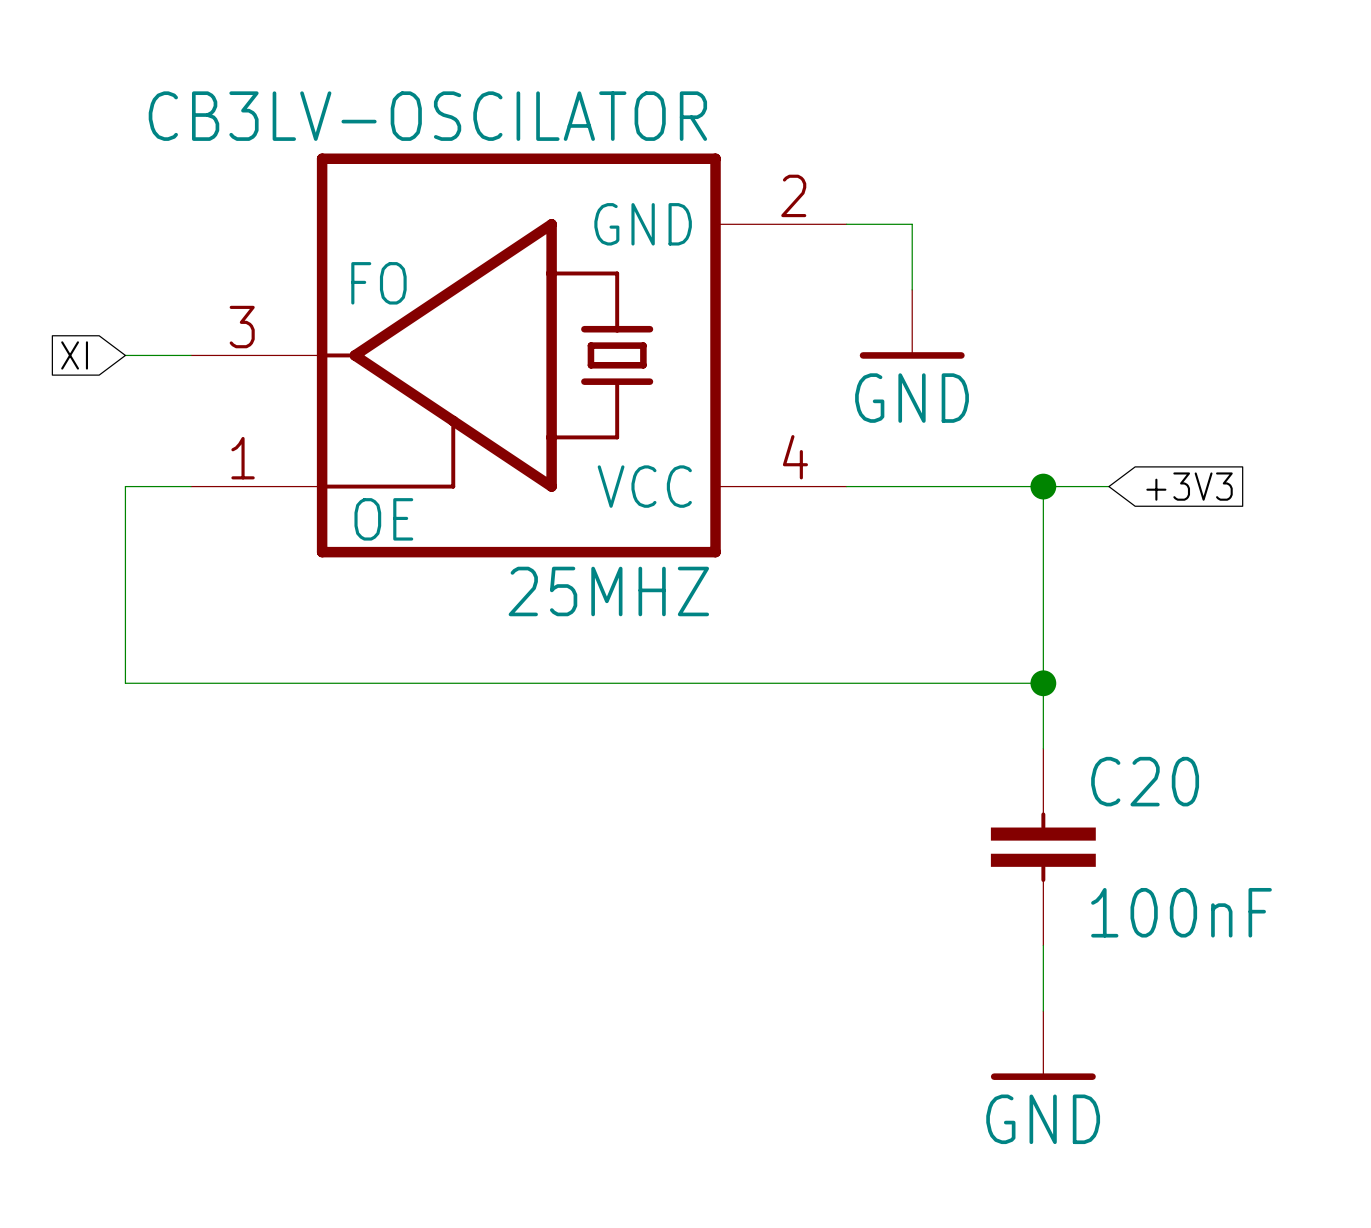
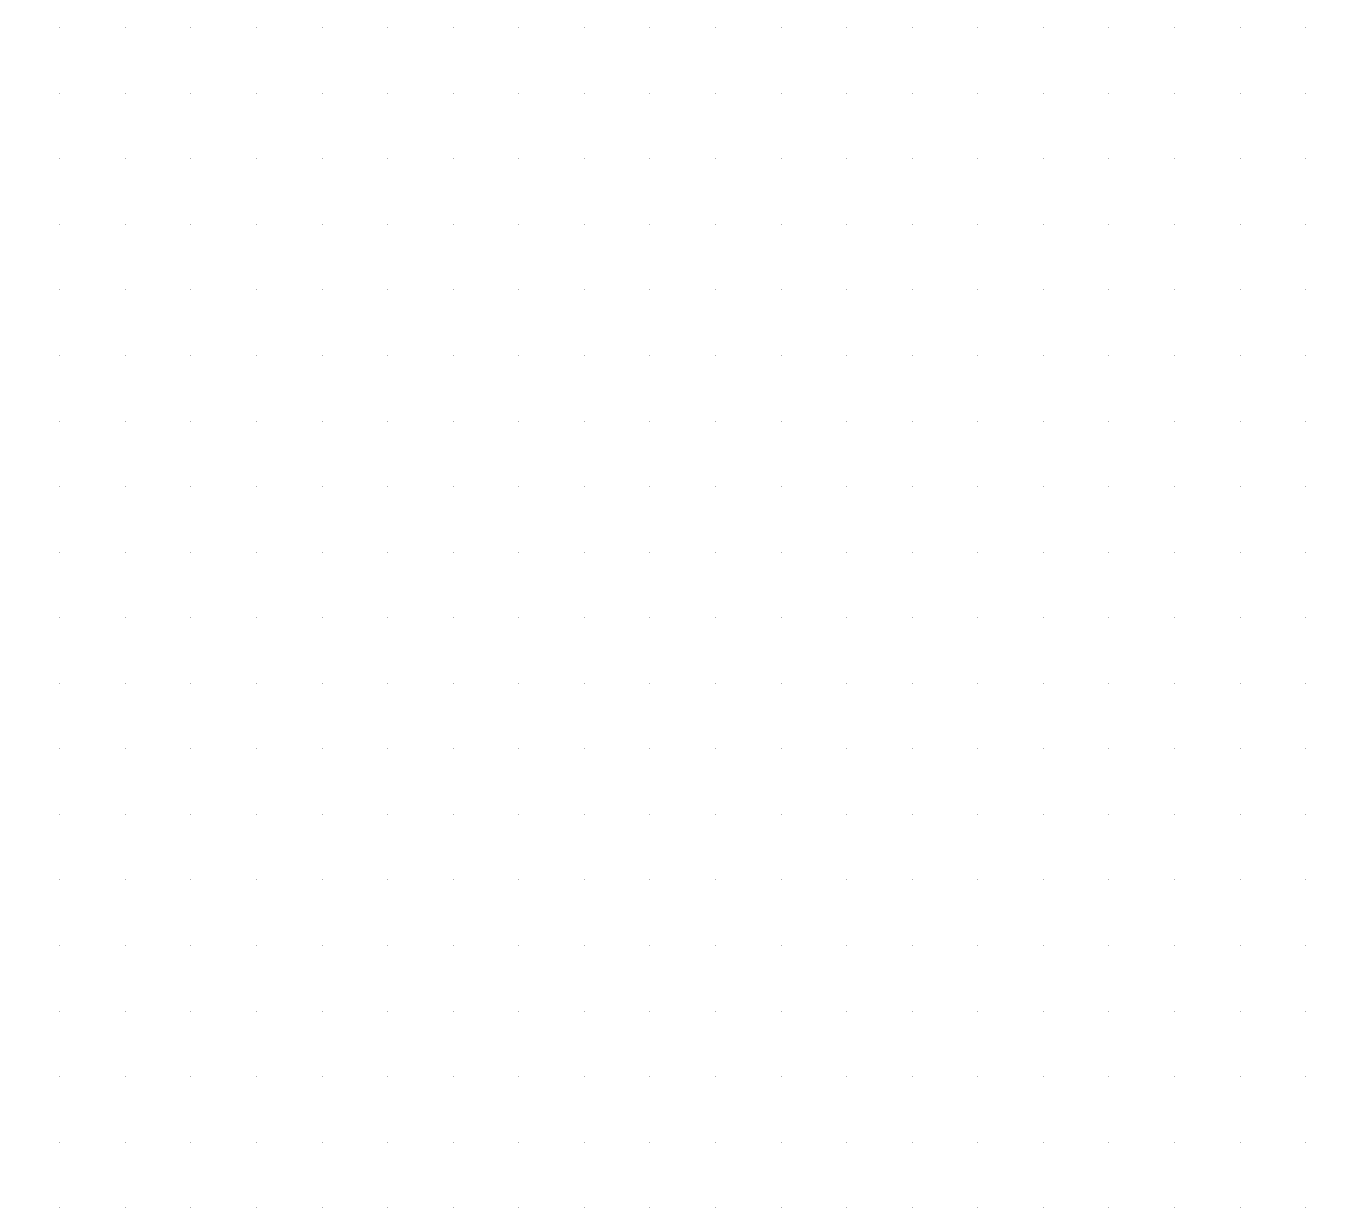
wire: (846, 224) (912, 224) (912, 289) -> none
power symbol: GND (912, 324) -> none
global label: XI (74, 355) -> none
wire: (125, 355) (190, 355) -> none
25MHZ: CB3LV-OSCILATOR (518, 355) -> none
wire: (190, 486) (125, 486) (125, 683) (1043, 683) -> none
wire: (846, 486) (1108, 486) -> none
wire: (1043, 486) (1043, 748) -> none
junction: (1043, 486) -> none
global label: +3V3 (1189, 486) -> none
junction: (1043, 683) -> none
C20: 100nF (1043, 847) -> none
wire: (1043, 945) (1043, 1011) -> none
power symbol: GND (1043, 1045) -> none

